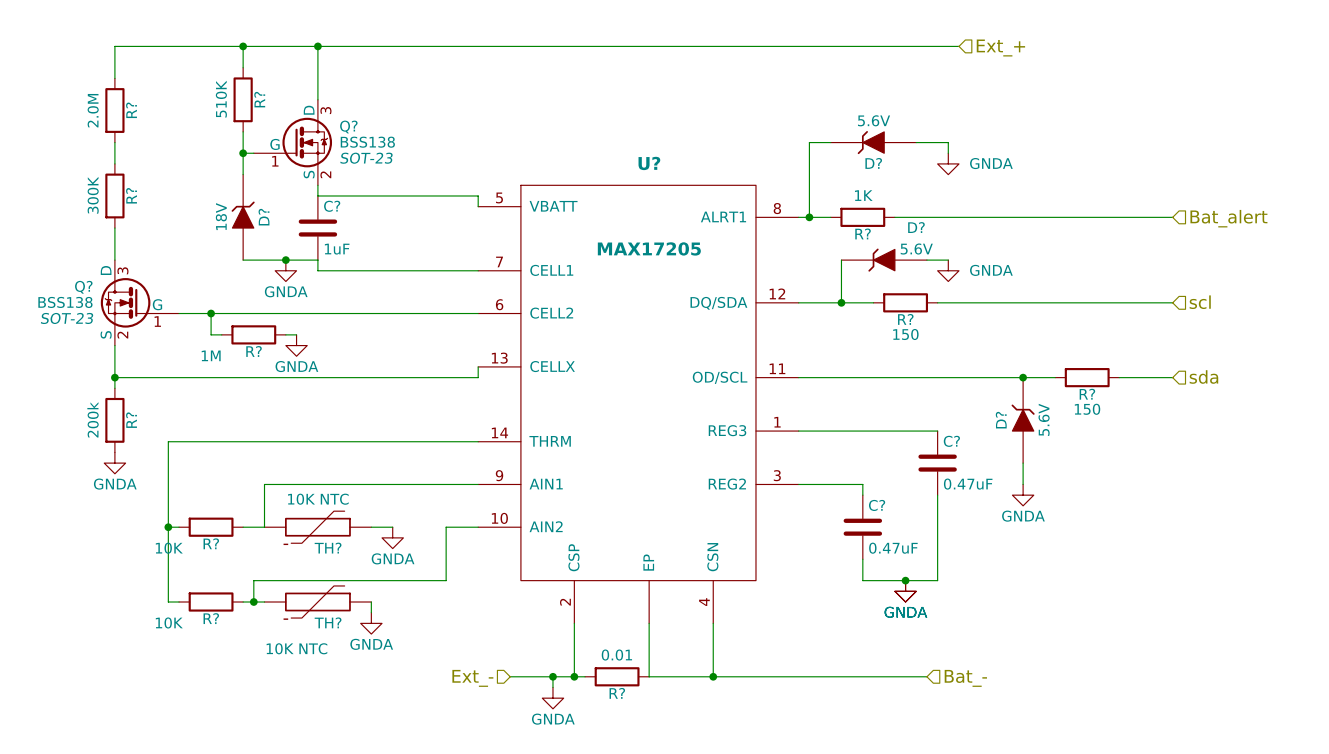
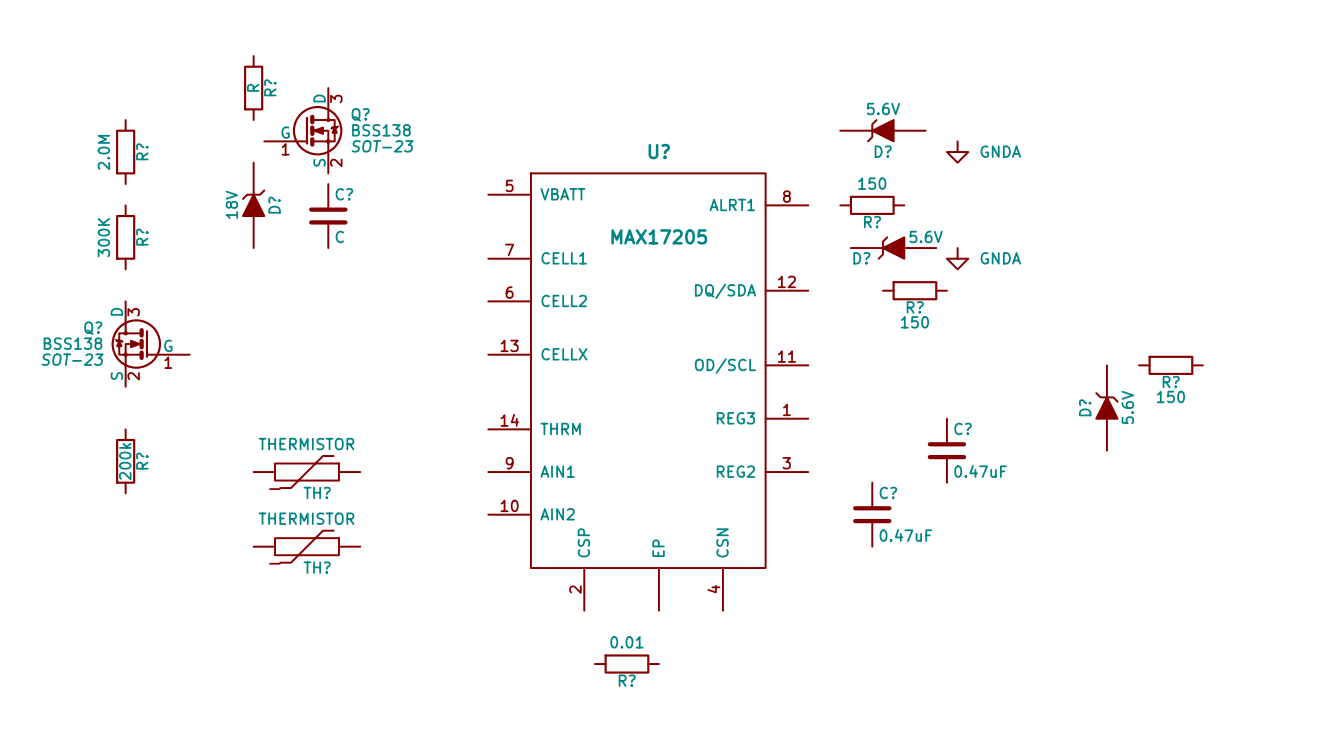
wire: (243, 46) (243, 67) -> none
junction: (243, 46) -> none
wire: (317, 46) (317, 99) -> none
junction: (317, 46) -> none
wire: (958, 46) (114, 46) (114, 78) -> none
hierarchical label: Ext_+ (1000, 48) -> none
R? value: 510K (221, 99) -> R (253, 87)
R? position: (114, 110) -> (125, 152)
wire: (243, 131) (243, 174) -> none
wire: (114, 142) (114, 163) -> none
wire: (830, 142) (809, 142) (809, 217) -> none
wire: (916, 142) (948, 142) (948, 153) -> none
wire: (243, 153) (253, 153) -> none
junction: (243, 153) -> none
wire: (317, 185) (317, 195) (478, 195) (478, 206) -> none
R? position: (114, 195) -> (125, 237)
R? value: 1K (863, 195) -> 150 (872, 183)
wire: (798, 217) (830, 217) -> none
junction: (809, 217) -> none
wire: (894, 217) (1172, 217) -> none
hierarchical label: Bat_alert (1228, 218) -> none
D? name position: D? (916, 227) -> D? (861, 258)
wire: (114, 228) (114, 260) -> none
C? value: 1uF (337, 249) -> C (339, 236)
wire: (243, 260) (317, 260) (317, 270) (478, 270) -> none
junction: (285, 260) -> none
wire: (841, 260) (841, 302) -> none
wire: (926, 260) (948, 260) -> none
power symbol: GNDA (285, 270) -> none
Q? position: (139, 302) -> (150, 344)
wire: (798, 302) (873, 302) -> none
junction: (841, 302) -> none
wire: (937, 302) (1172, 302) -> none
hierarchical label: scl (1200, 302) -> none
wire: (179, 313) (478, 313) -> none
wire: (211, 313) (211, 334) (221, 334) -> none
junction: (211, 313) -> none
R?: 1M (253, 334) -> none
wire: (285, 334) (296, 334) -> none
power symbol: GNDA (296, 345) -> none
wire: (478, 366) (478, 377) (114, 377) -> none
junction: (114, 377) -> none
wire: (798, 377) (1055, 377) -> none
junction: (1023, 377) -> none
R? position: (1087, 377) -> (1170, 365)
wire: (1119, 377) (1172, 377) -> none
hierarchical label: sda (1203, 377) -> none
R? value position: 200k (93, 419) -> 200k (125, 461)
R? position: (114, 420) -> (125, 461)
D? position: (1023, 420) -> (1106, 408)
wire: (798, 431) (937, 431) -> none
wire: (478, 441) (168, 441) (168, 602) (179, 602) -> none
power symbol: GNDA (114, 463) -> none
wire: (1023, 463) (1023, 484) -> none
TH?: none -> THERMISTOR (306, 472)
wire: (478, 484) (264, 484) (264, 527) (243, 527) -> none
wire: (798, 484) (862, 484) (862, 495) -> none
wire: (937, 495) (937, 580) (862, 580) (862, 559) -> none
power symbol: GNDA (1023, 495) -> none
wire: (168, 527) (179, 527) -> none
junction: (168, 527) -> none
R?: 10K (211, 527) -> none
TH?: 10K NTC (317, 527) -> none
wire: (371, 527) (392, 527) -> none
wire: (478, 527) (446, 527) (446, 580) (253, 580) (253, 602) -> none
power symbol: GNDA (392, 537) -> none
TH?: none -> THERMISTOR (306, 546)
junction: (905, 580) -> none
power symbol: GNDA (905, 591) -> none
R?: 10K (211, 602) -> none
wire: (243, 602) (264, 602) -> none
junction: (253, 602) -> none
TH?: 10K NTC (317, 602) -> none
wire: (371, 602) (371, 612) -> none
power symbol: GNDA (371, 623) -> none
wire: (574, 623) (574, 676) -> none
wire: (649, 623) (649, 676) (926, 676) -> none
wire: (713, 623) (713, 676) -> none
wire: (510, 676) (585, 676) -> none
wire: (552, 676) (552, 687) -> none
junction: (552, 676) -> none
junction: (574, 676) -> none
junction: (713, 676) -> none
hierarchical label: Ext_- (472, 678) -> none
hierarchical label: Bat_- (965, 678) -> none
power symbol: GNDA (552, 698) -> none

